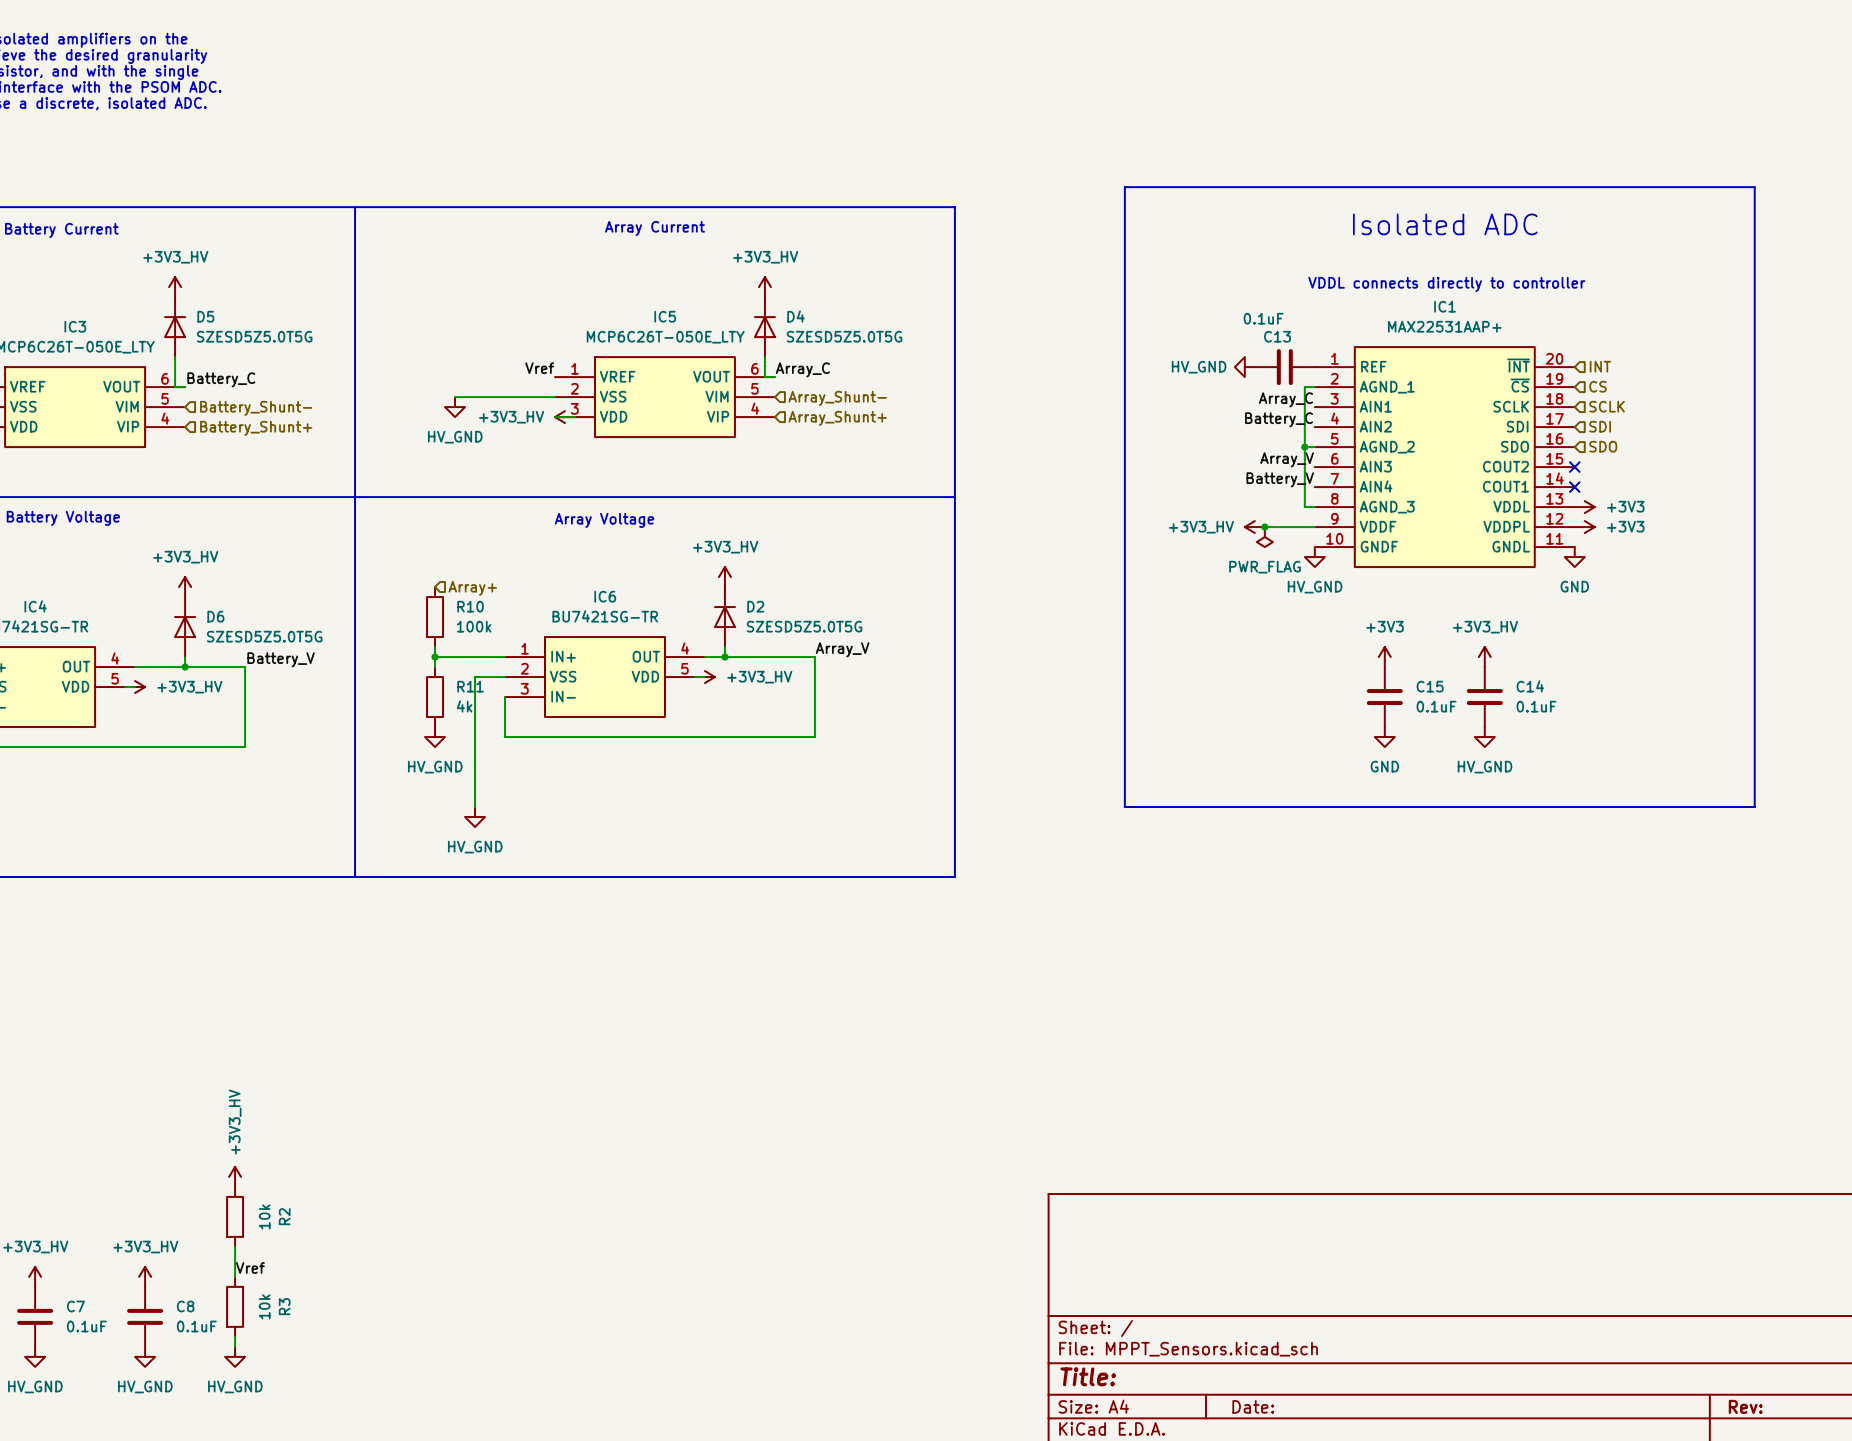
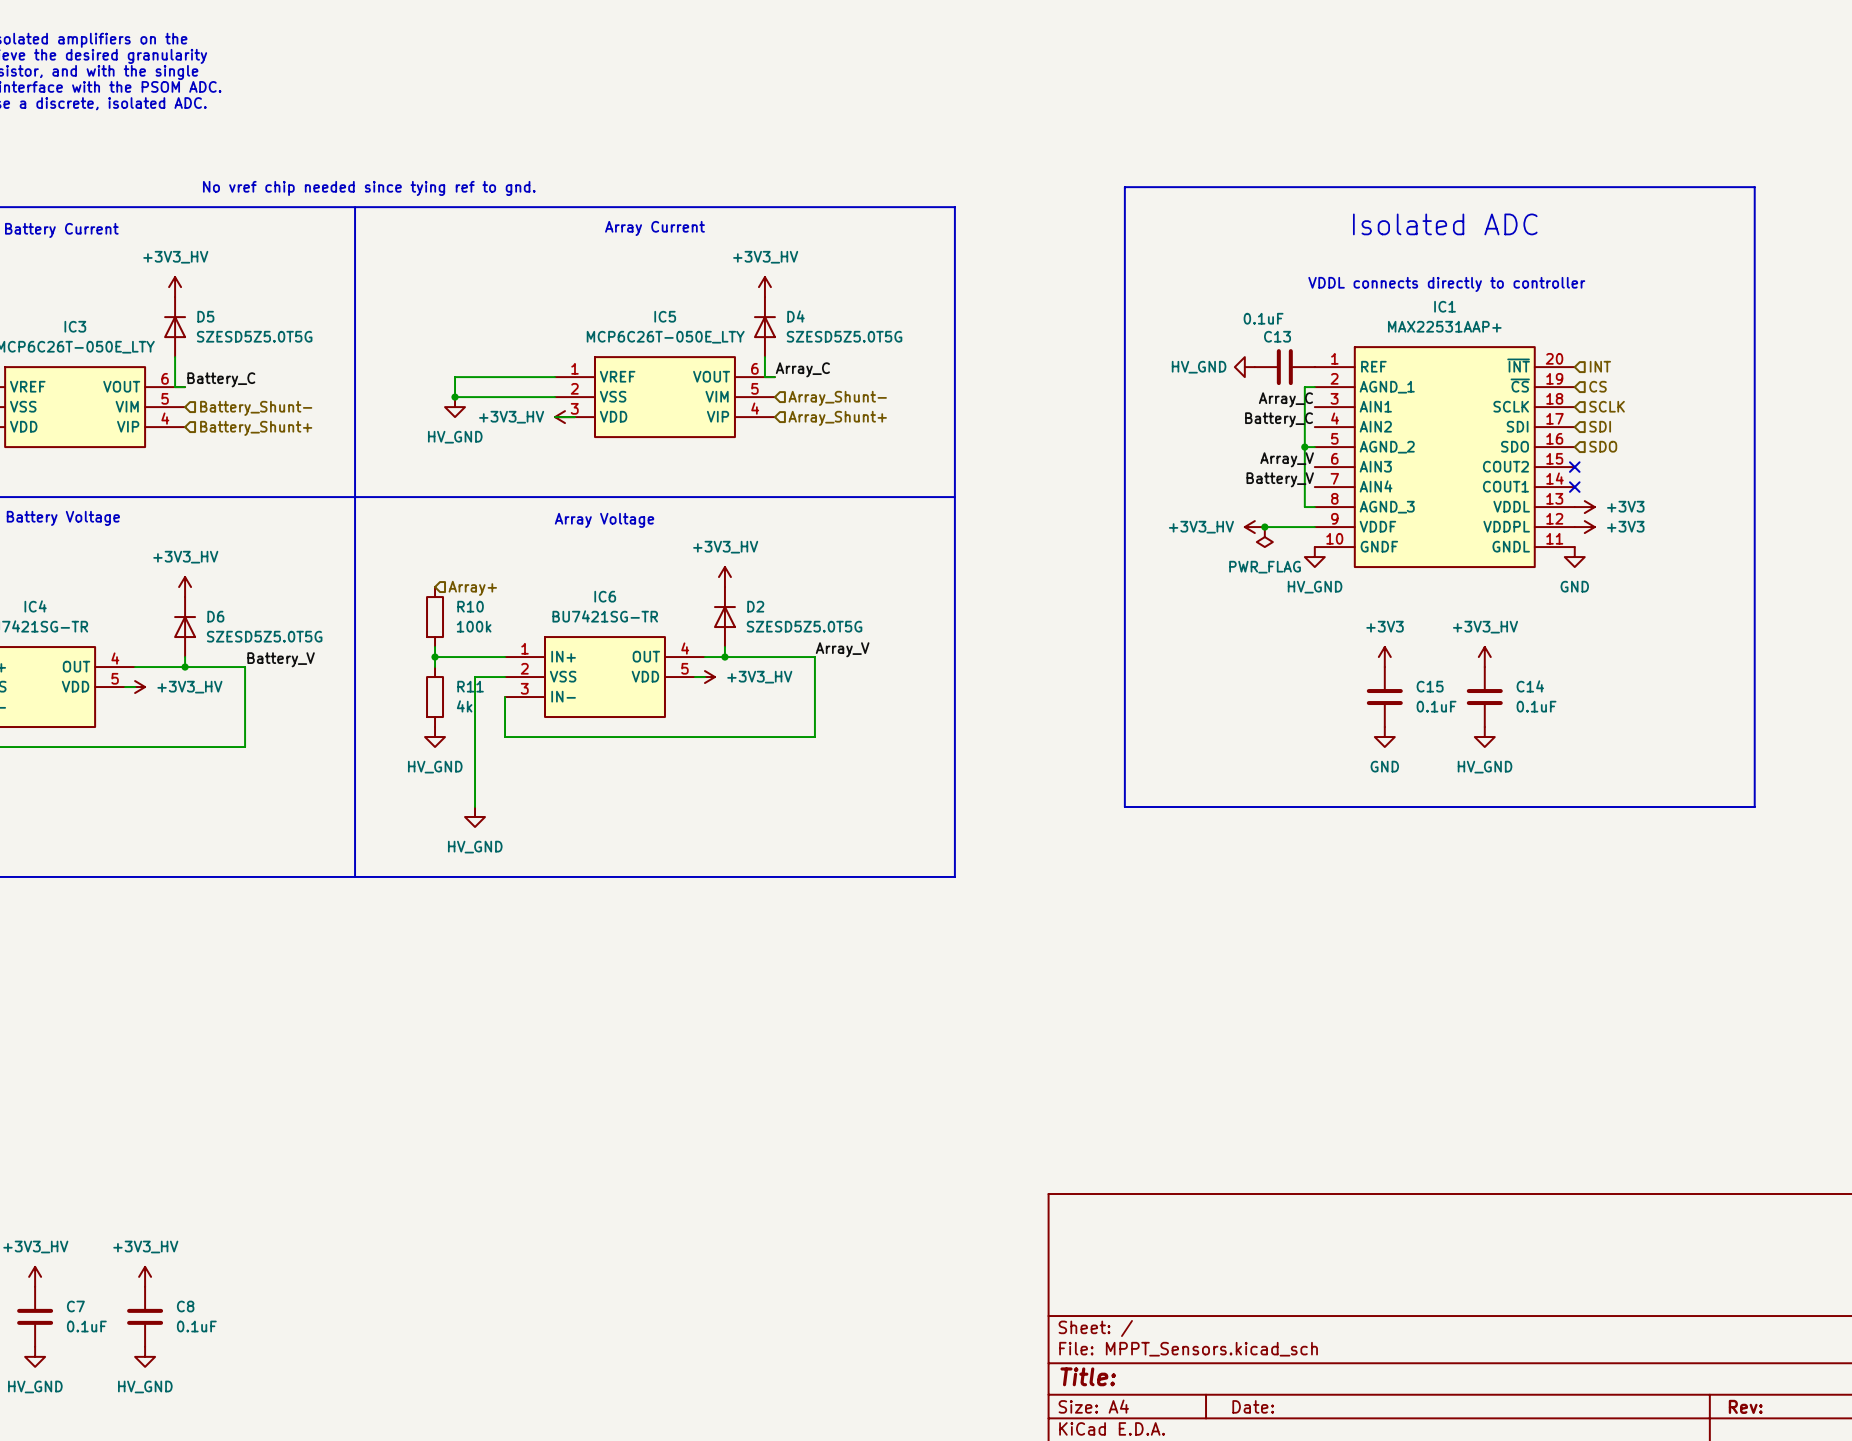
text: none -> No vref chip needed since tying ref to gnd. (369, 188)
label: Vref (539, 368) -> none
wire: none -> (555, 377) (455, 377) (455, 397)
junction: none -> (455, 397)
power symbol: +3V3_HV (235, 1176) -> none
R2: 10k (235, 1216) -> none
wire: (235, 1246) (235, 1276) -> none
label: Vref (250, 1267) -> none
R3: 10k (235, 1306) -> none
wire: (235, 1336) (235, 1346) -> none
power symbol: HV_GND (235, 1356) -> none

